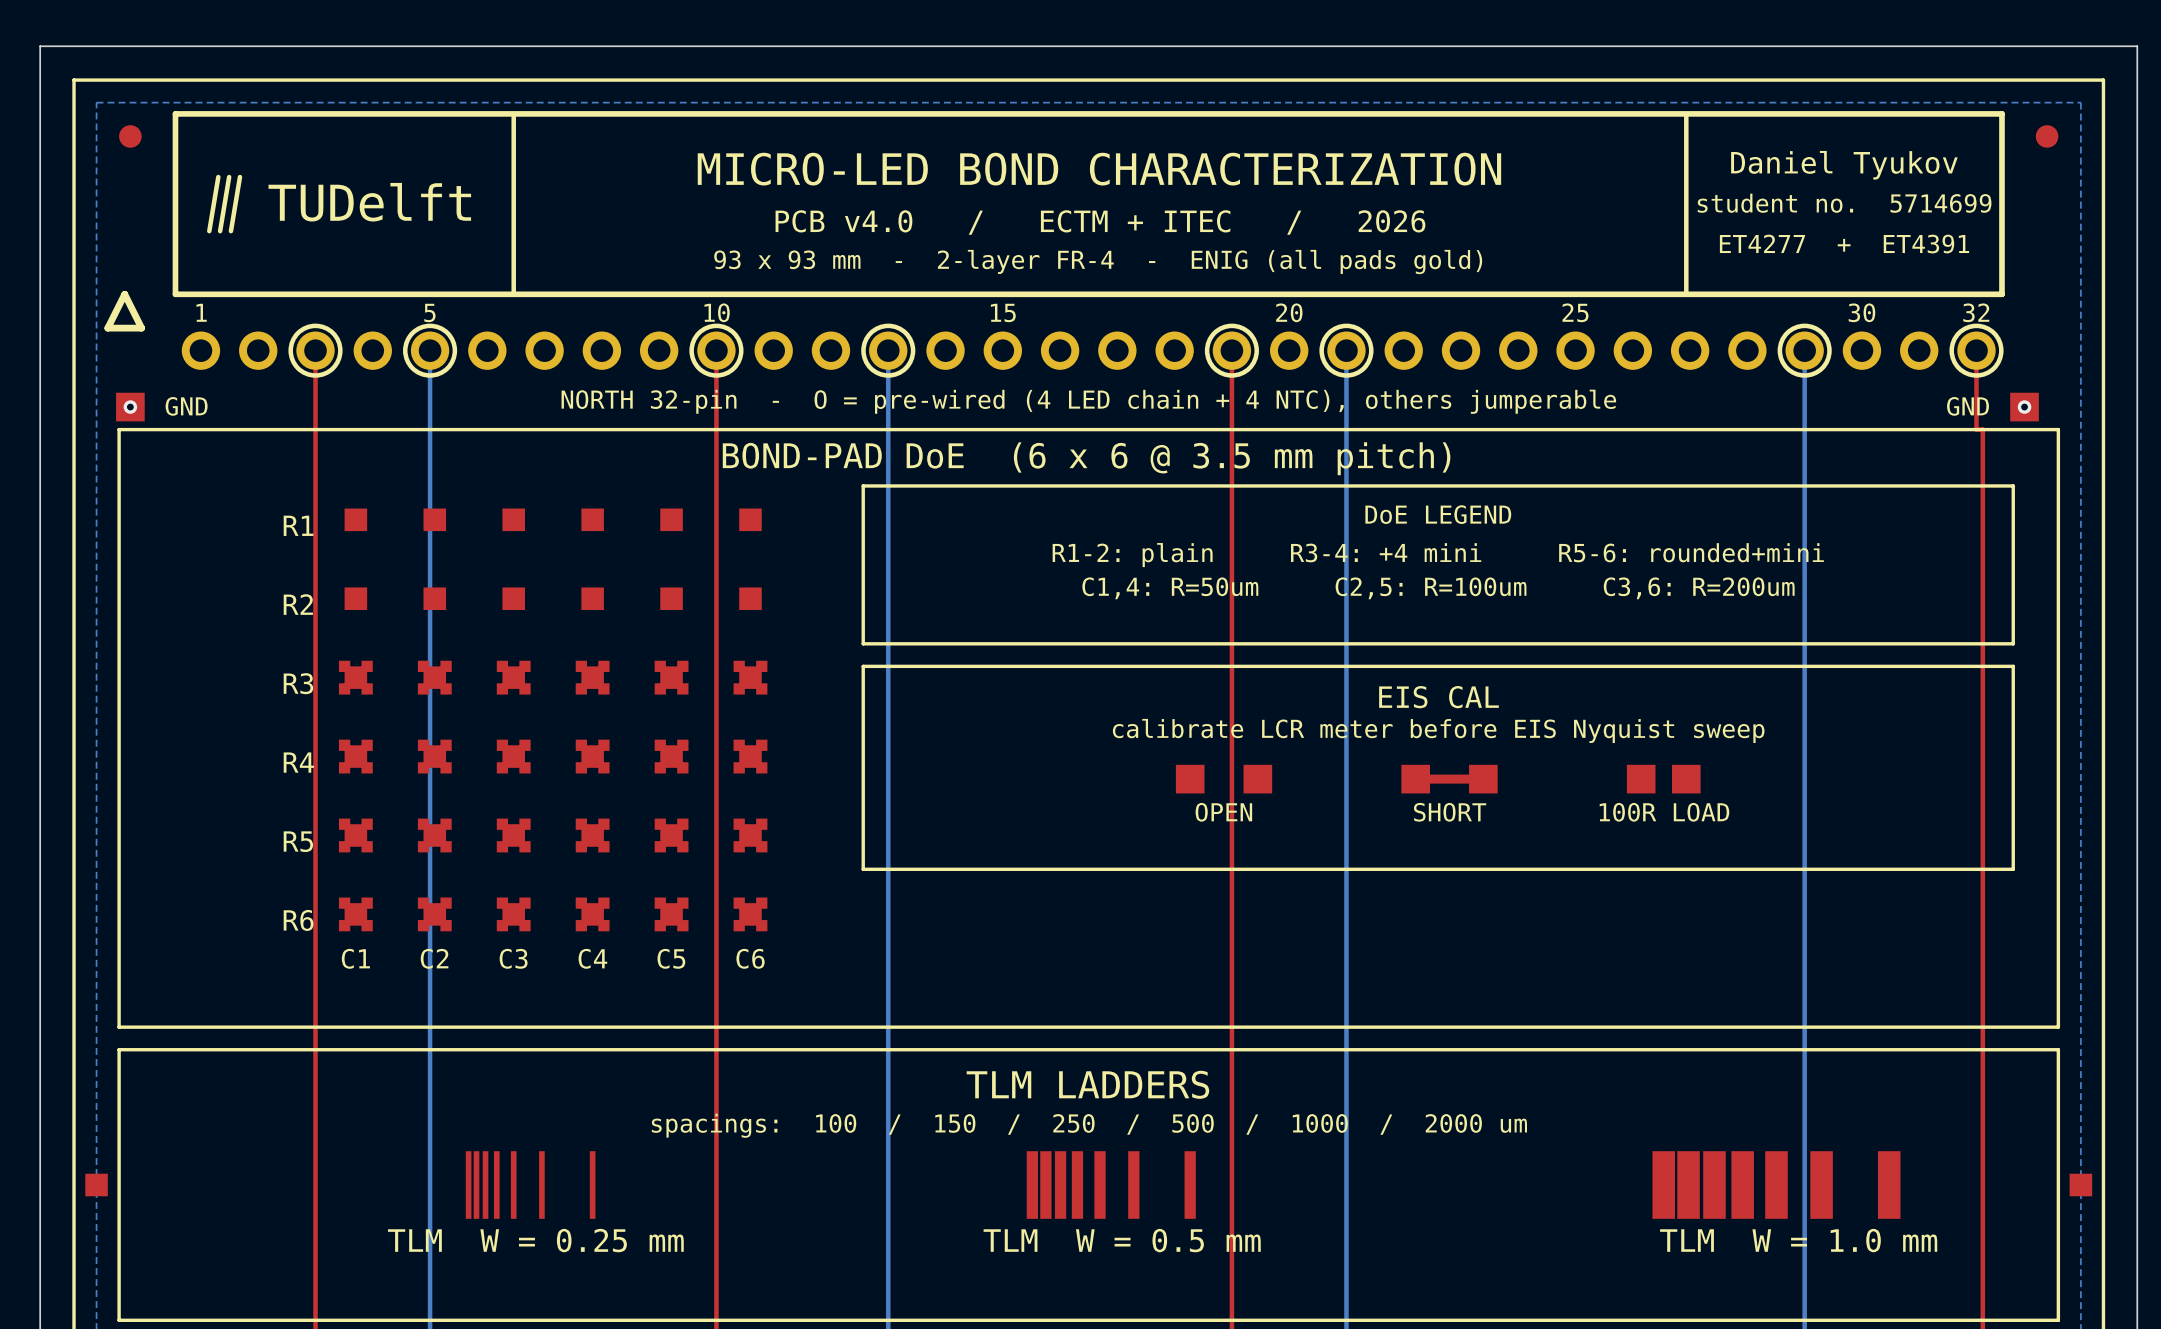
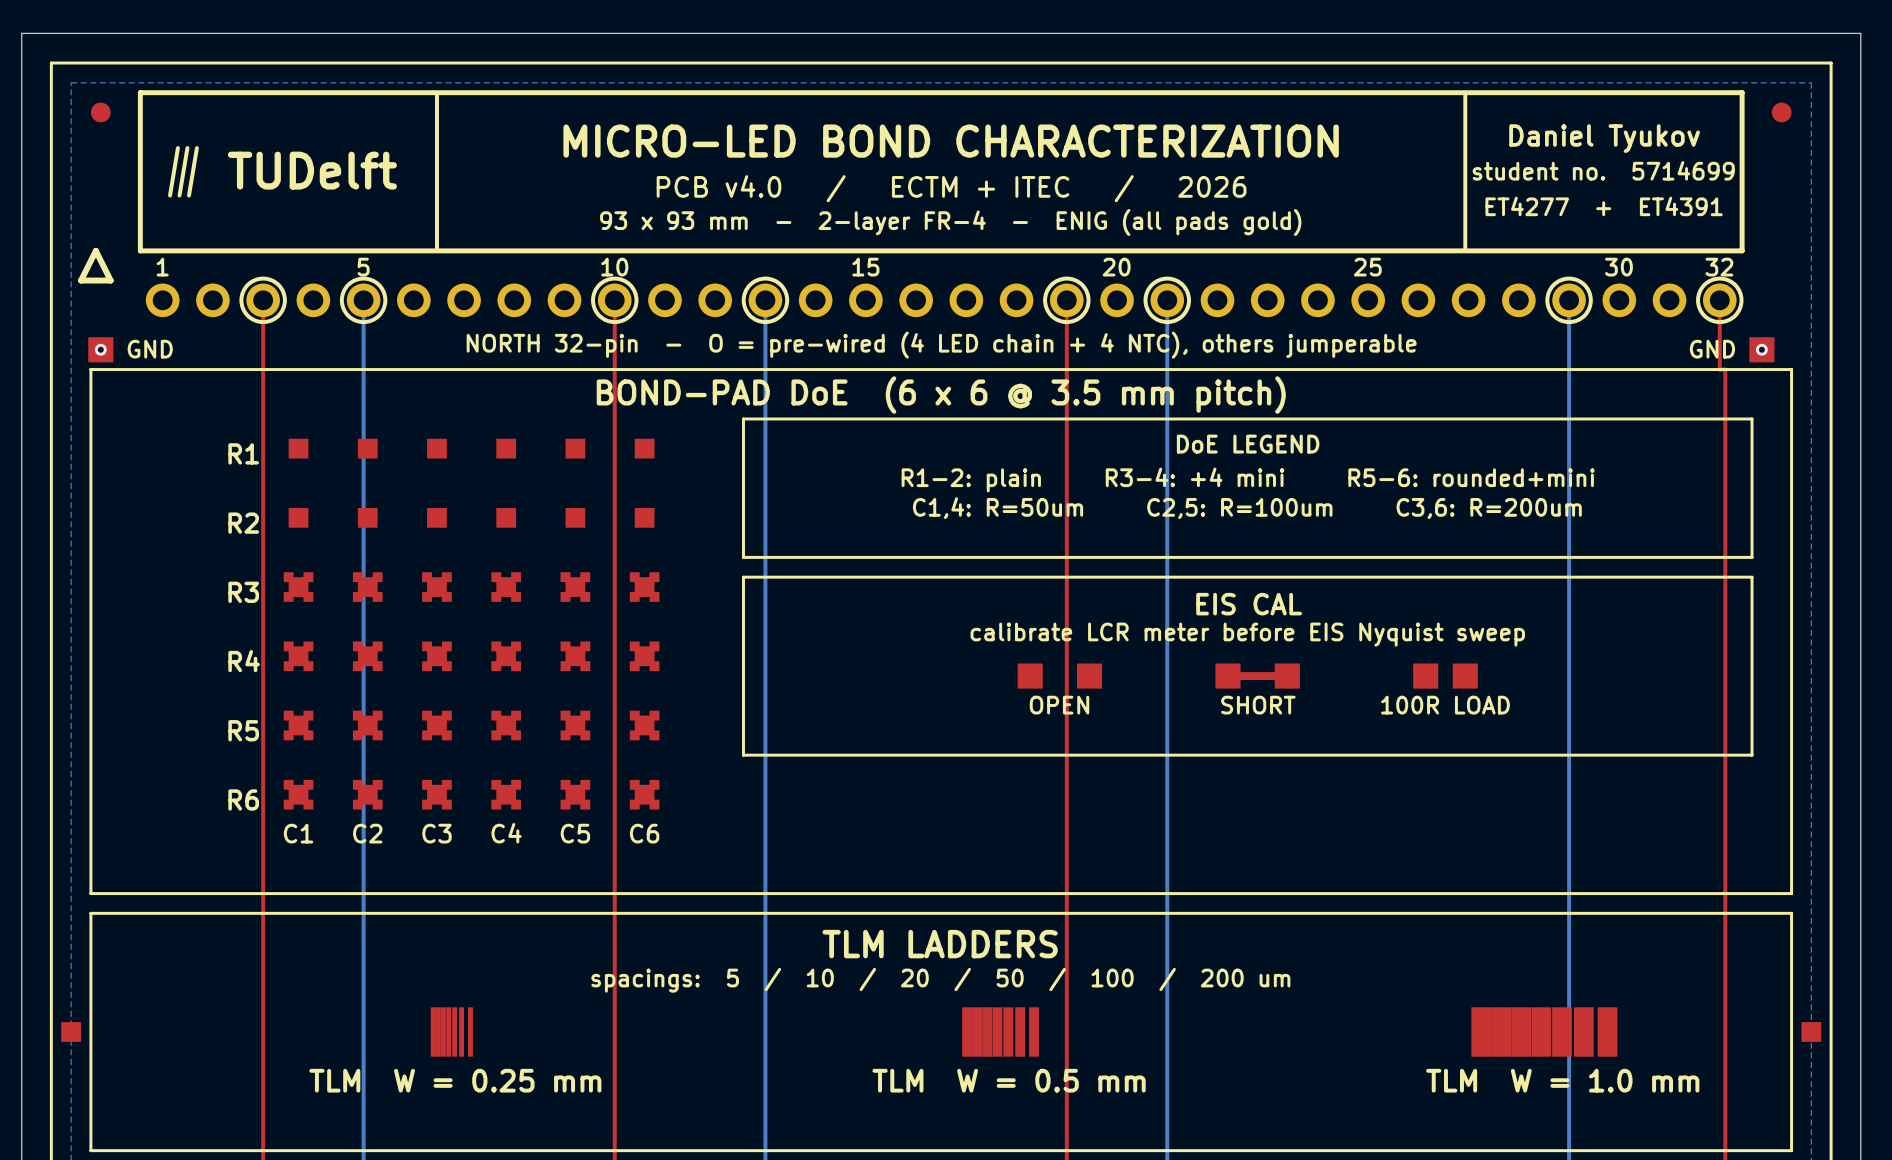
text: spacings: 100 / 150 / 250 / 500 / 1000 / 2000 um (1089, 1125) -> spacings: 5 / 10 / 20 / 50 / 100 / 200 um (940, 980)
part footprint: [465, 1151, 596, 1219] -> [430, 1007, 473, 1057]
part footprint: [1652, 1151, 1901, 1219] -> [1471, 1007, 1618, 1057]
part: (1111, 1185) -> none
part: none -> (1000, 1031)
text position: TLM W = 0.5 mm (1122, 1240) -> TLM W = 0.5 mm (1009, 1080)

